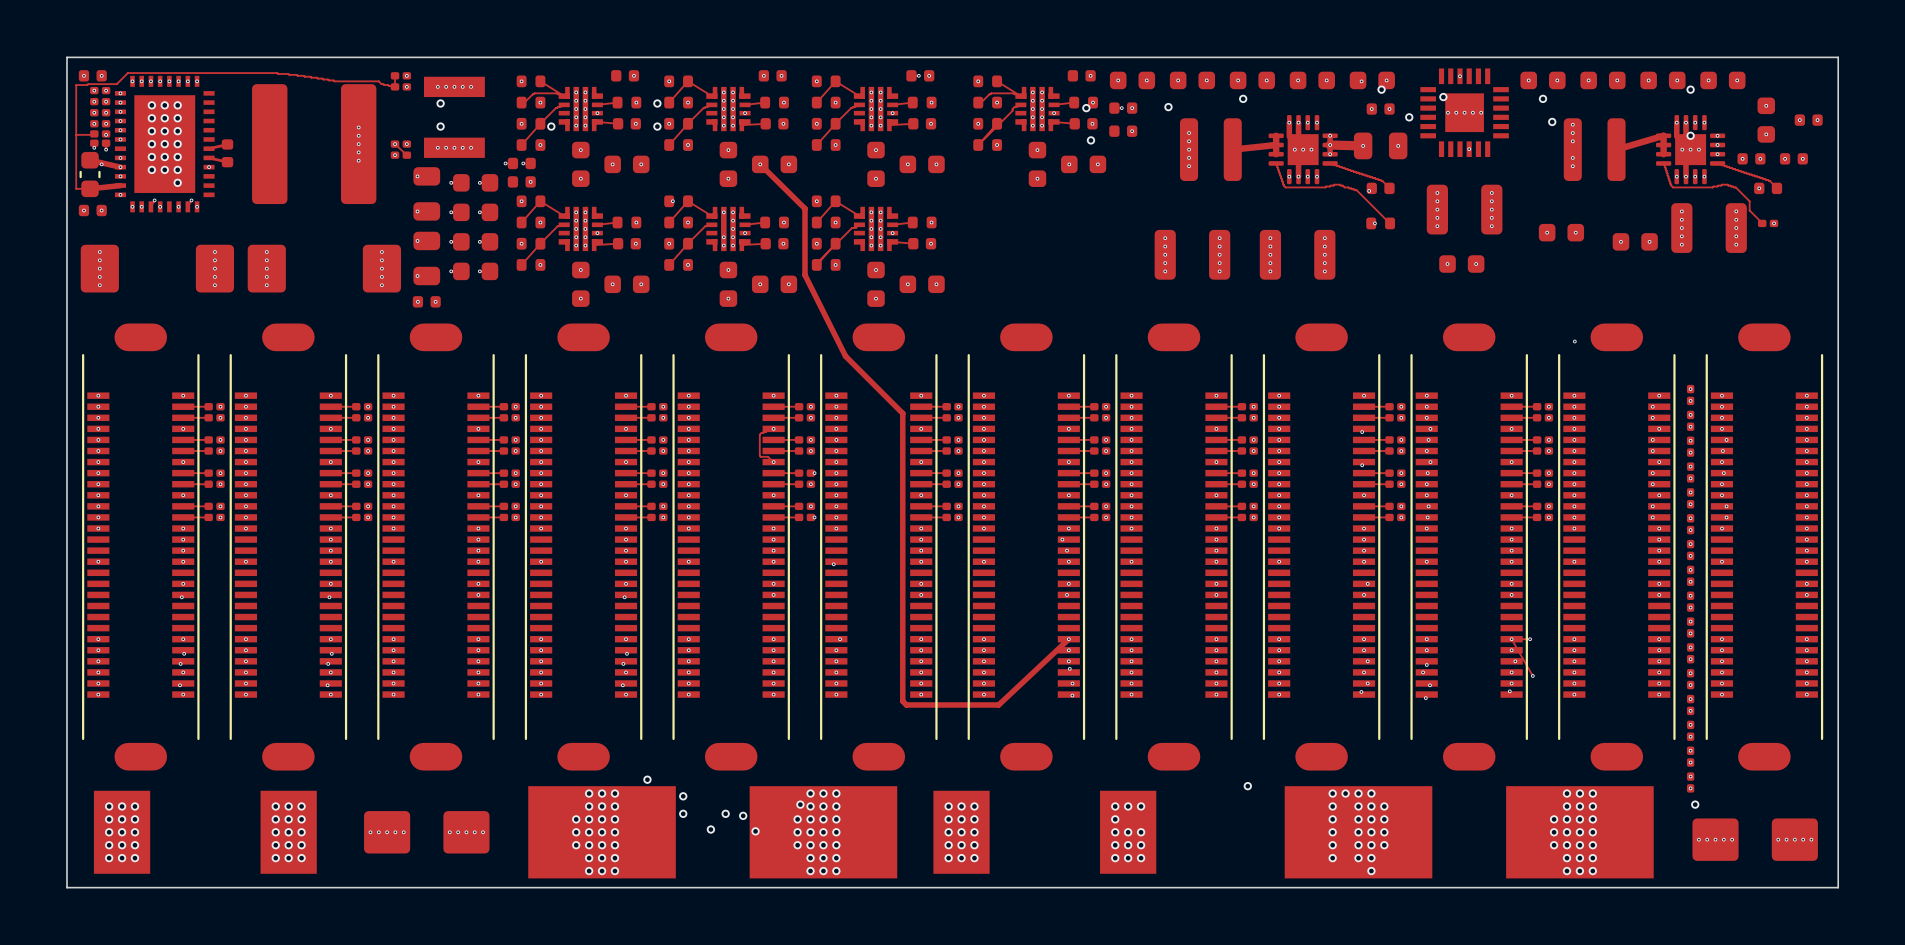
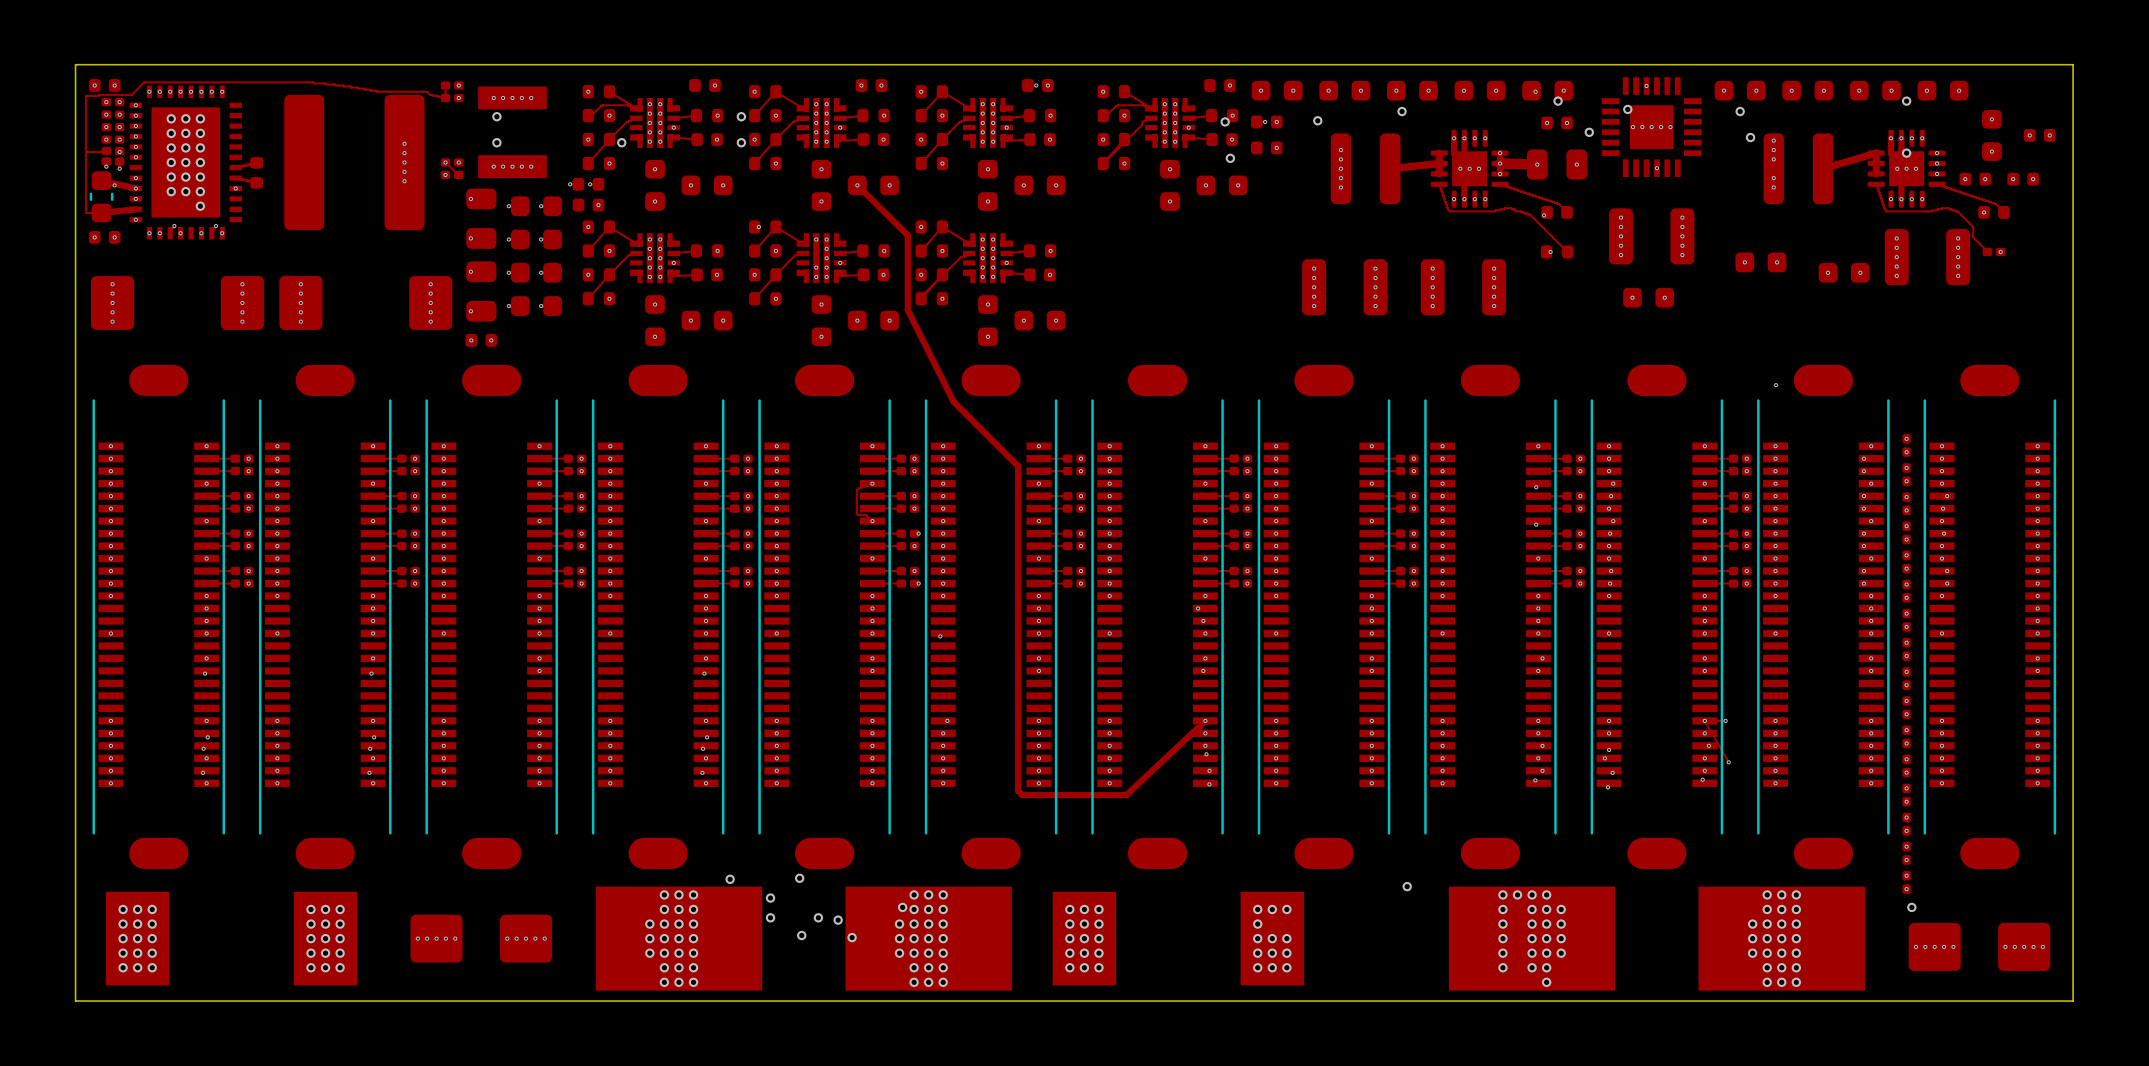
via: none -> (799, 878)

